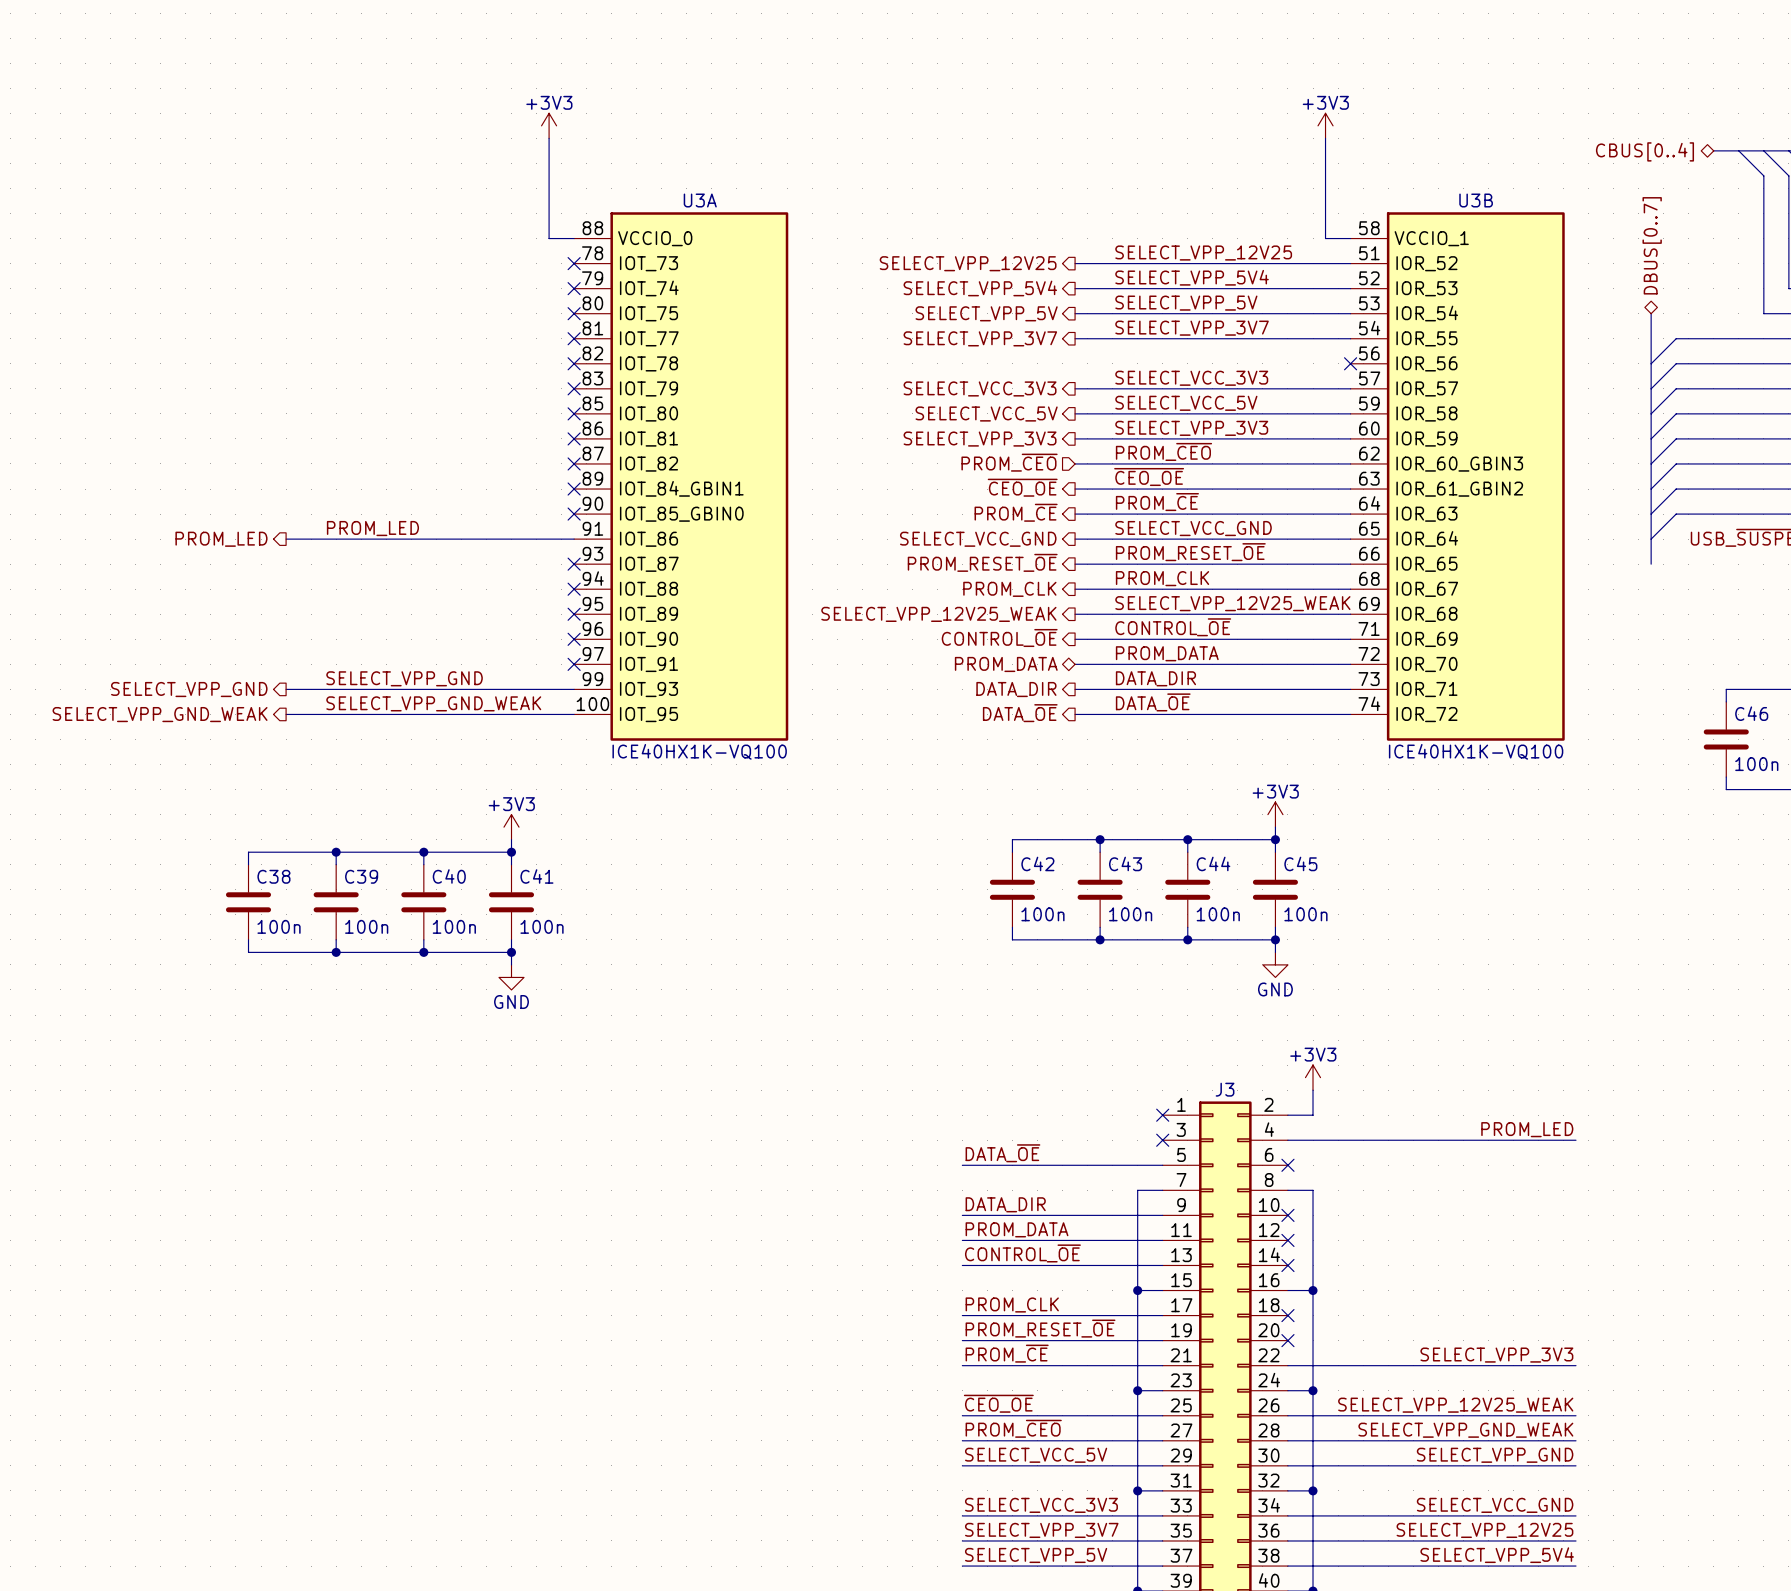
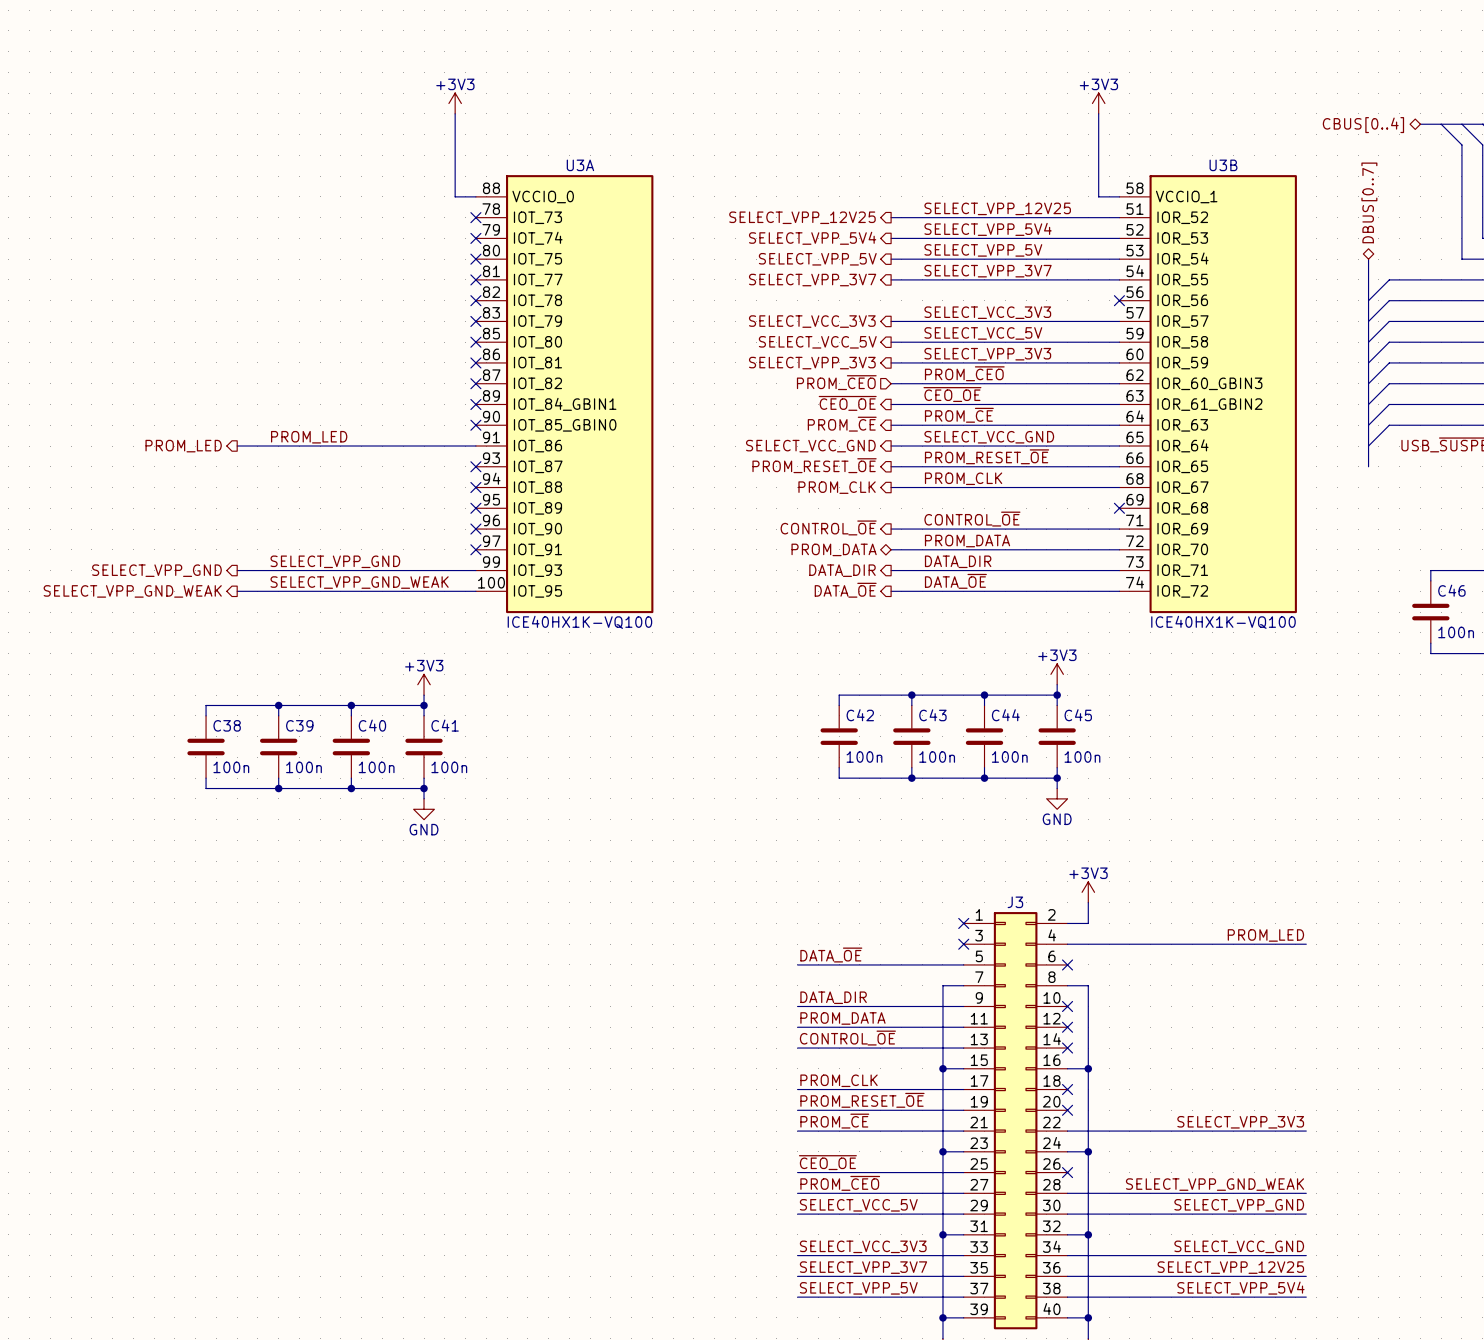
label: SELECT_VPP_12V25_WEAK (1232, 603) -> none
hierarchical label: SELECT_VPP_12V25_WEAK (938, 614) -> none
wire: (1075, 614) (1350, 614) -> none
no-connect mark: none -> (1119, 508)
label: SELECT_VPP_12V25_WEAK (1455, 1405) -> none
wire: (1287, 1415) (1575, 1415) -> none
no-connect mark: none -> (1067, 1172)

